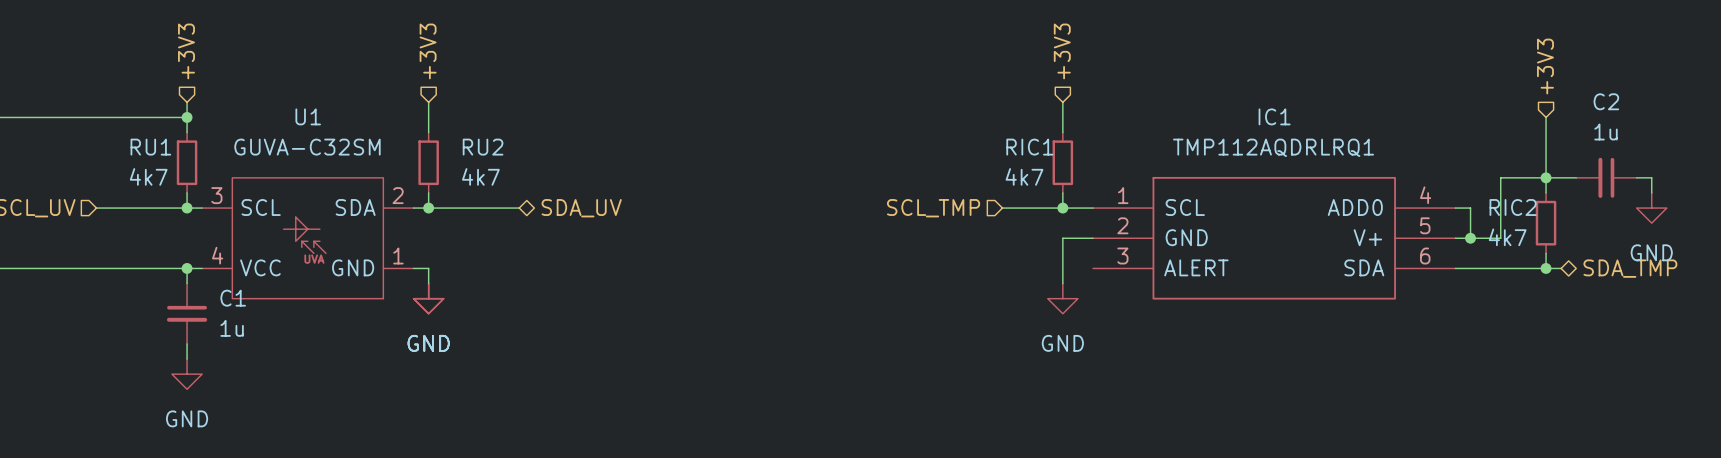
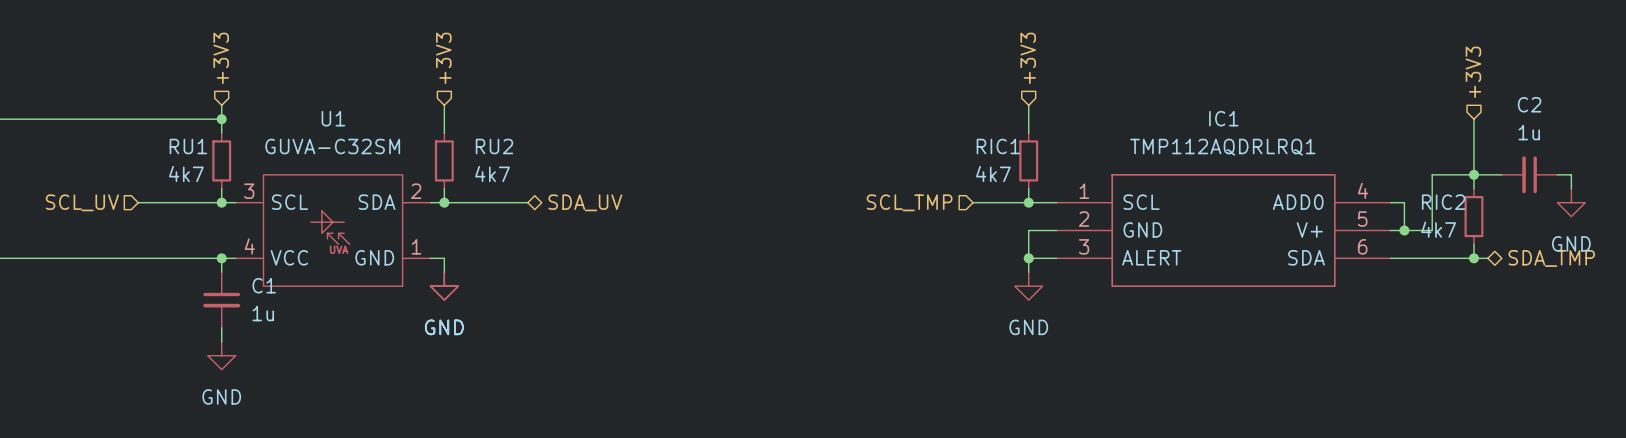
wire: none -> (1028, 258) (1056, 258)
junction: none -> (1028, 258)

